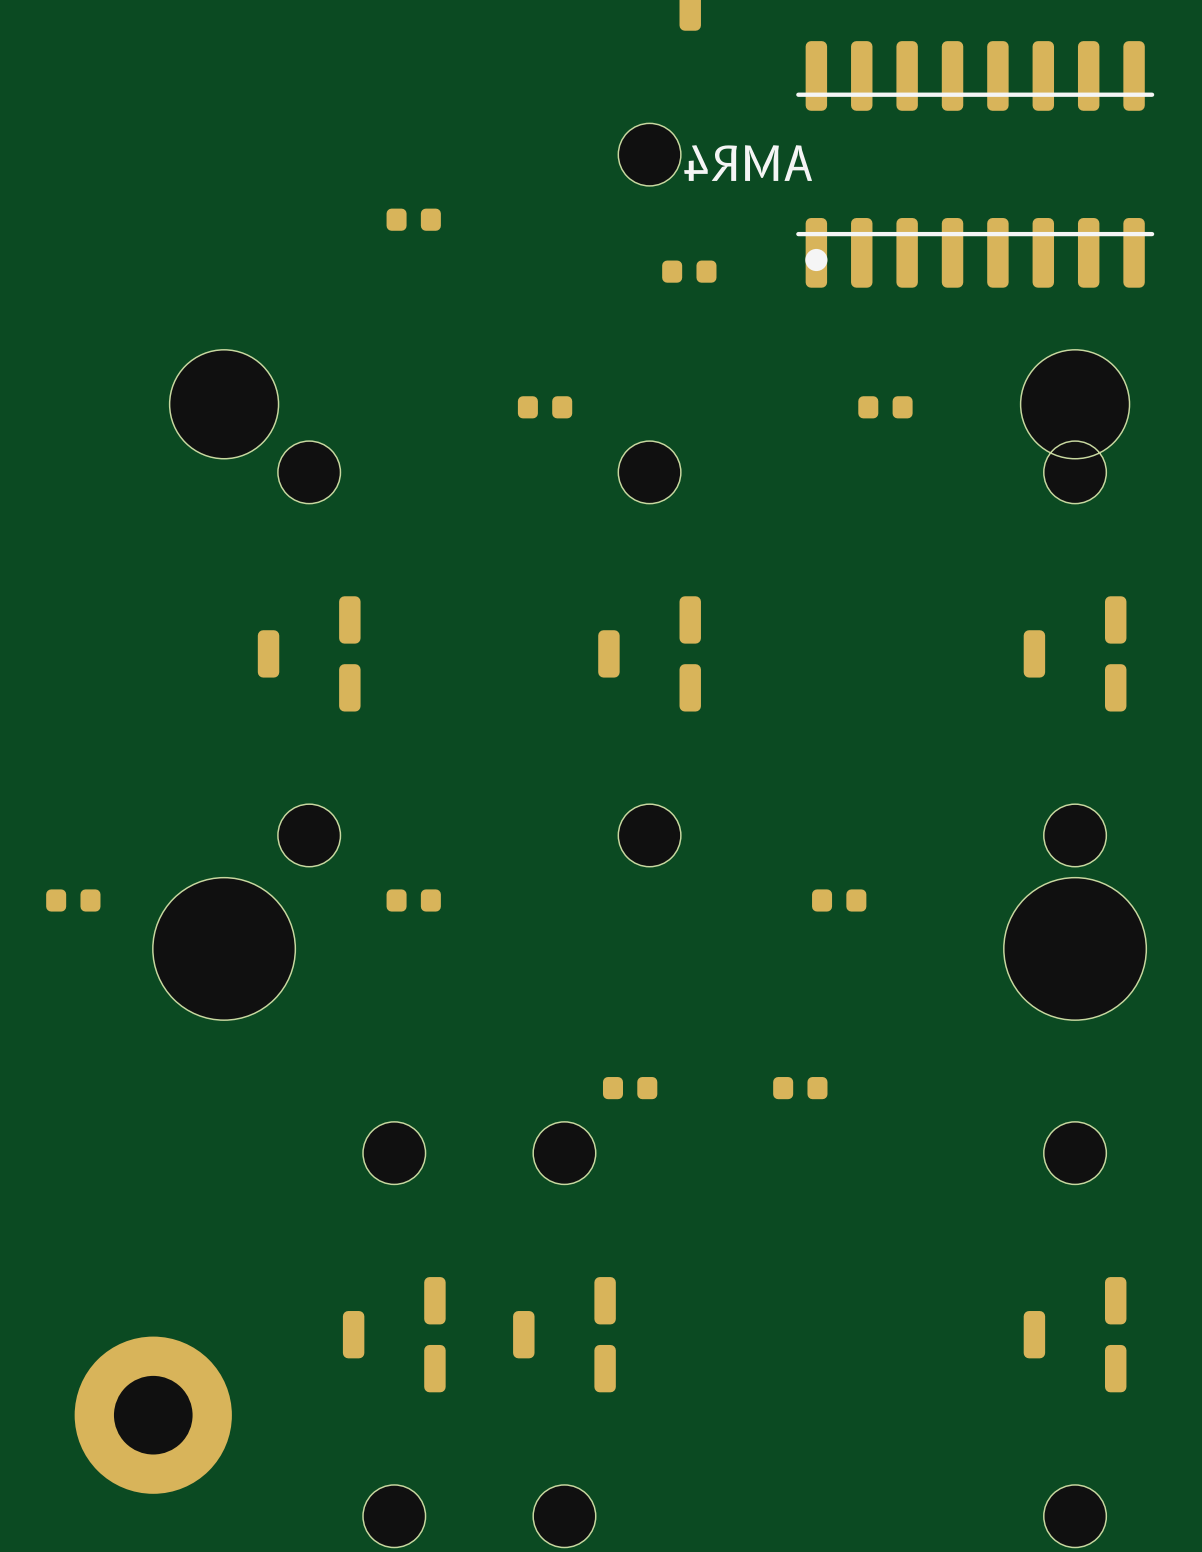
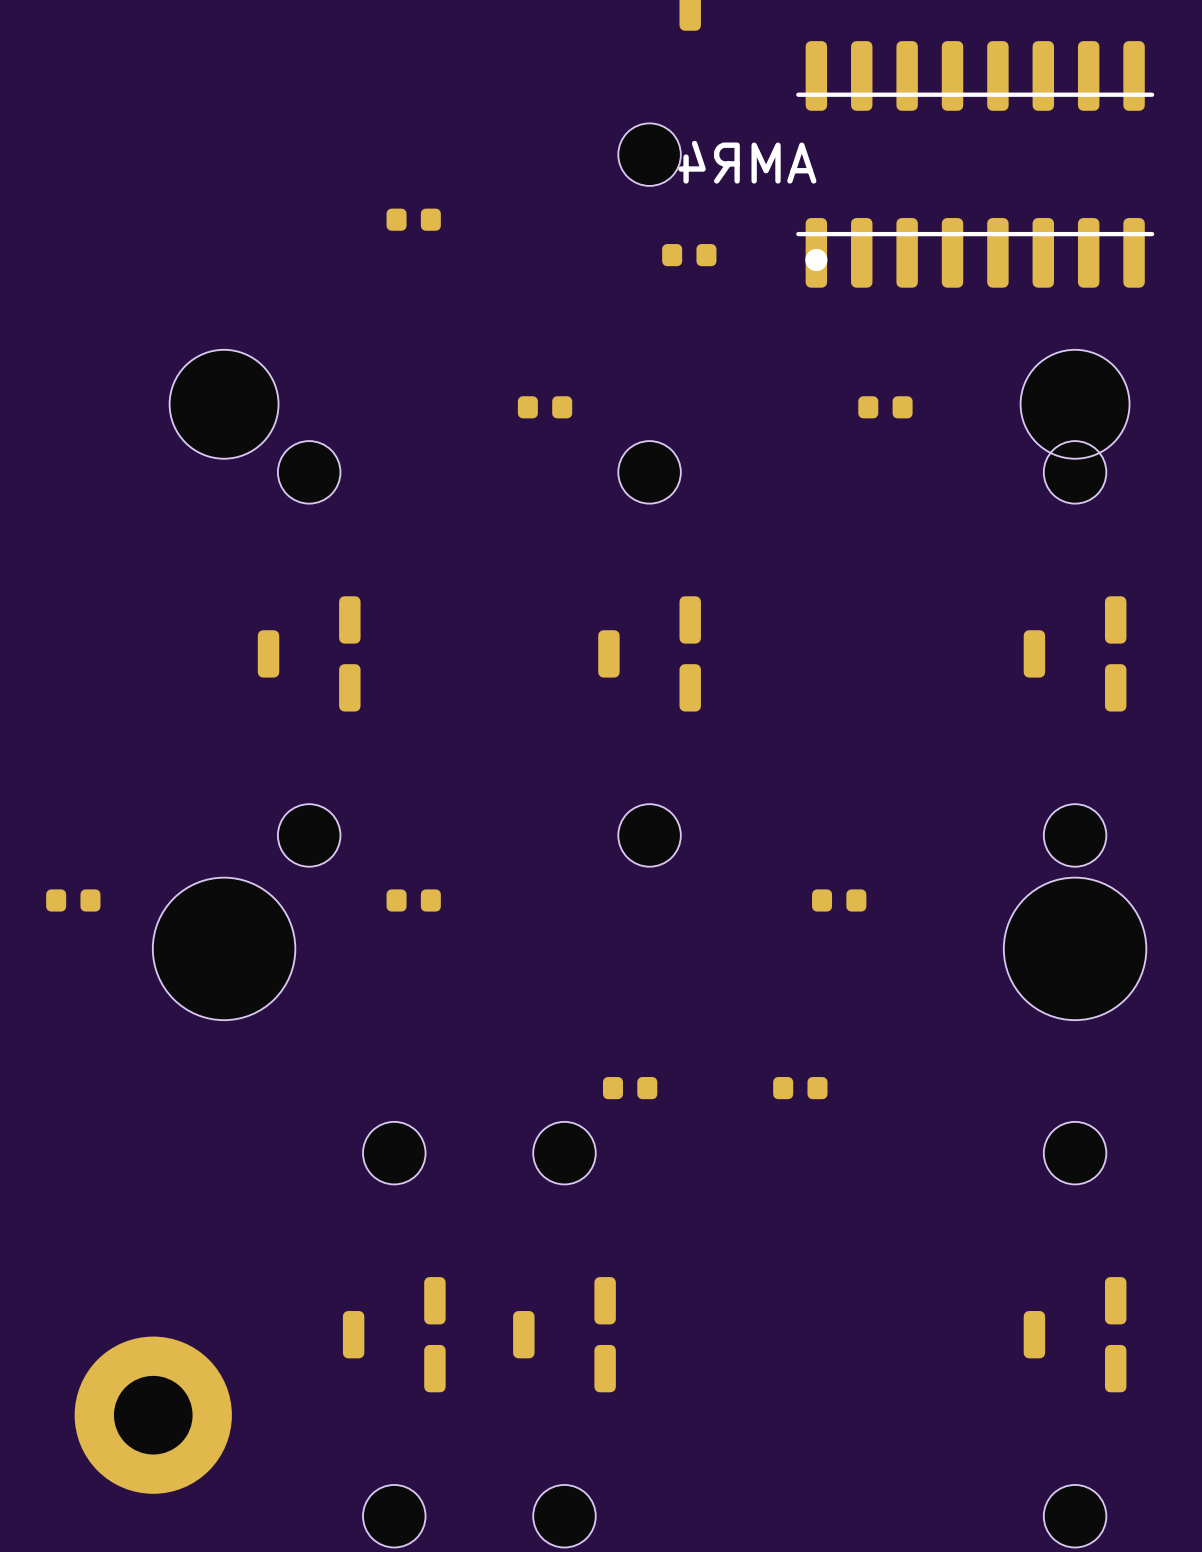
part position: (689, 271) -> (689, 255)

